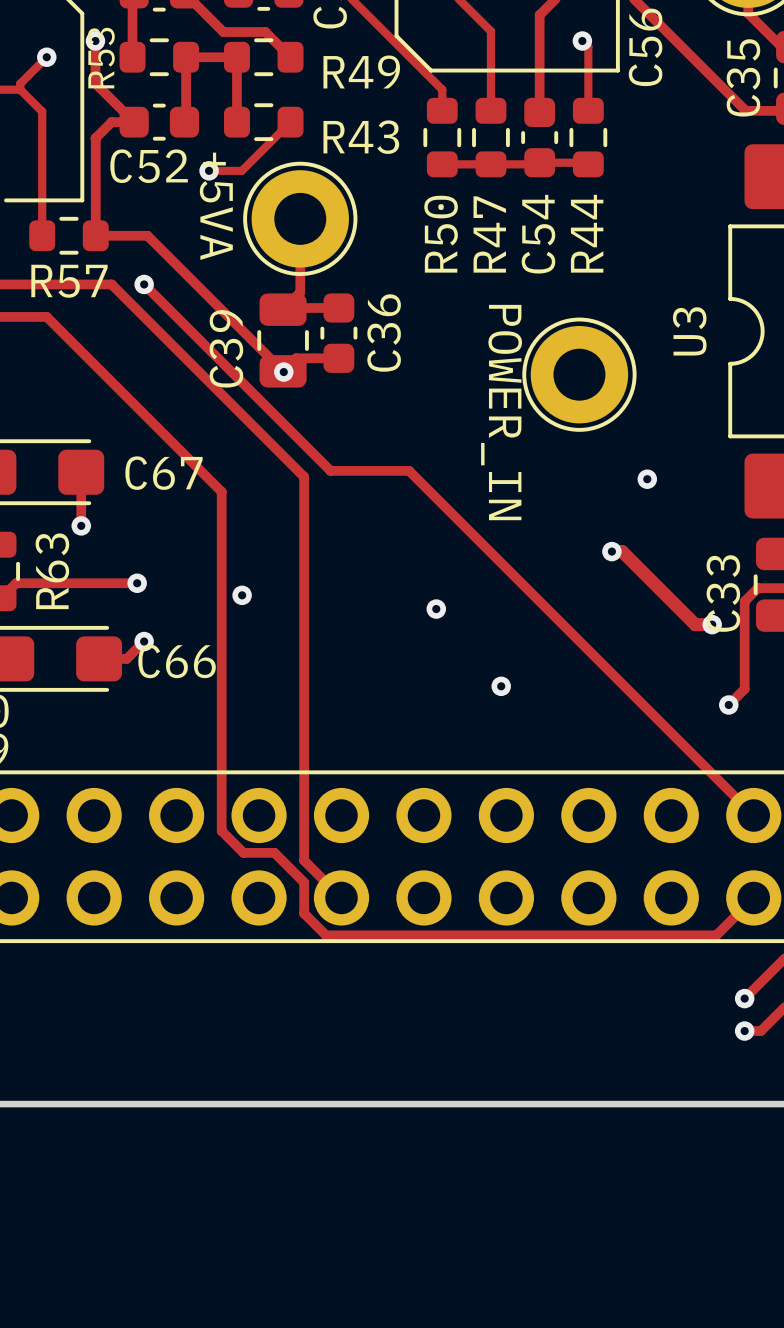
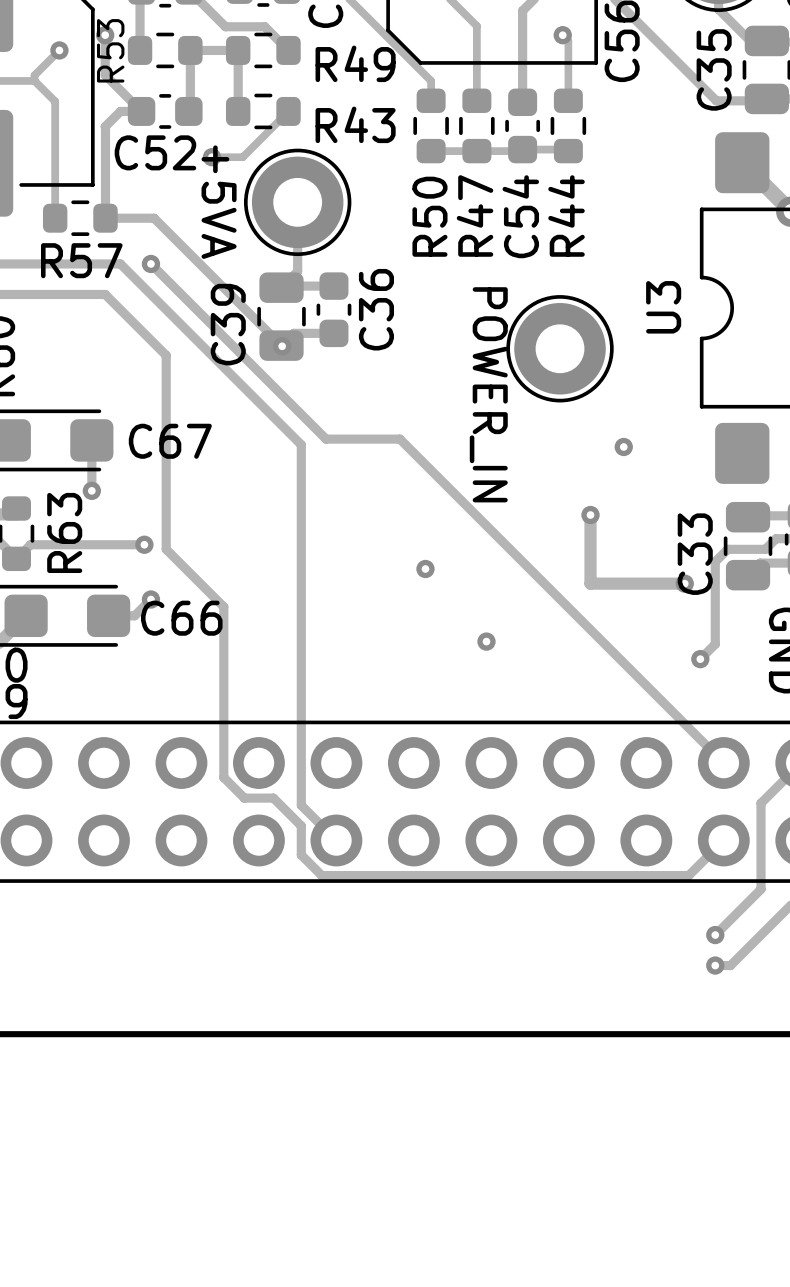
track: (46, 316) (221, 491) (221, 649) -> (59, 294) (105, 294) (166, 355) (166, 549) (223, 606)
track: (611, 551) (622, 551) (695, 624) -> (590, 515) (590, 583) (668, 583)
via: (242, 595) -> none

